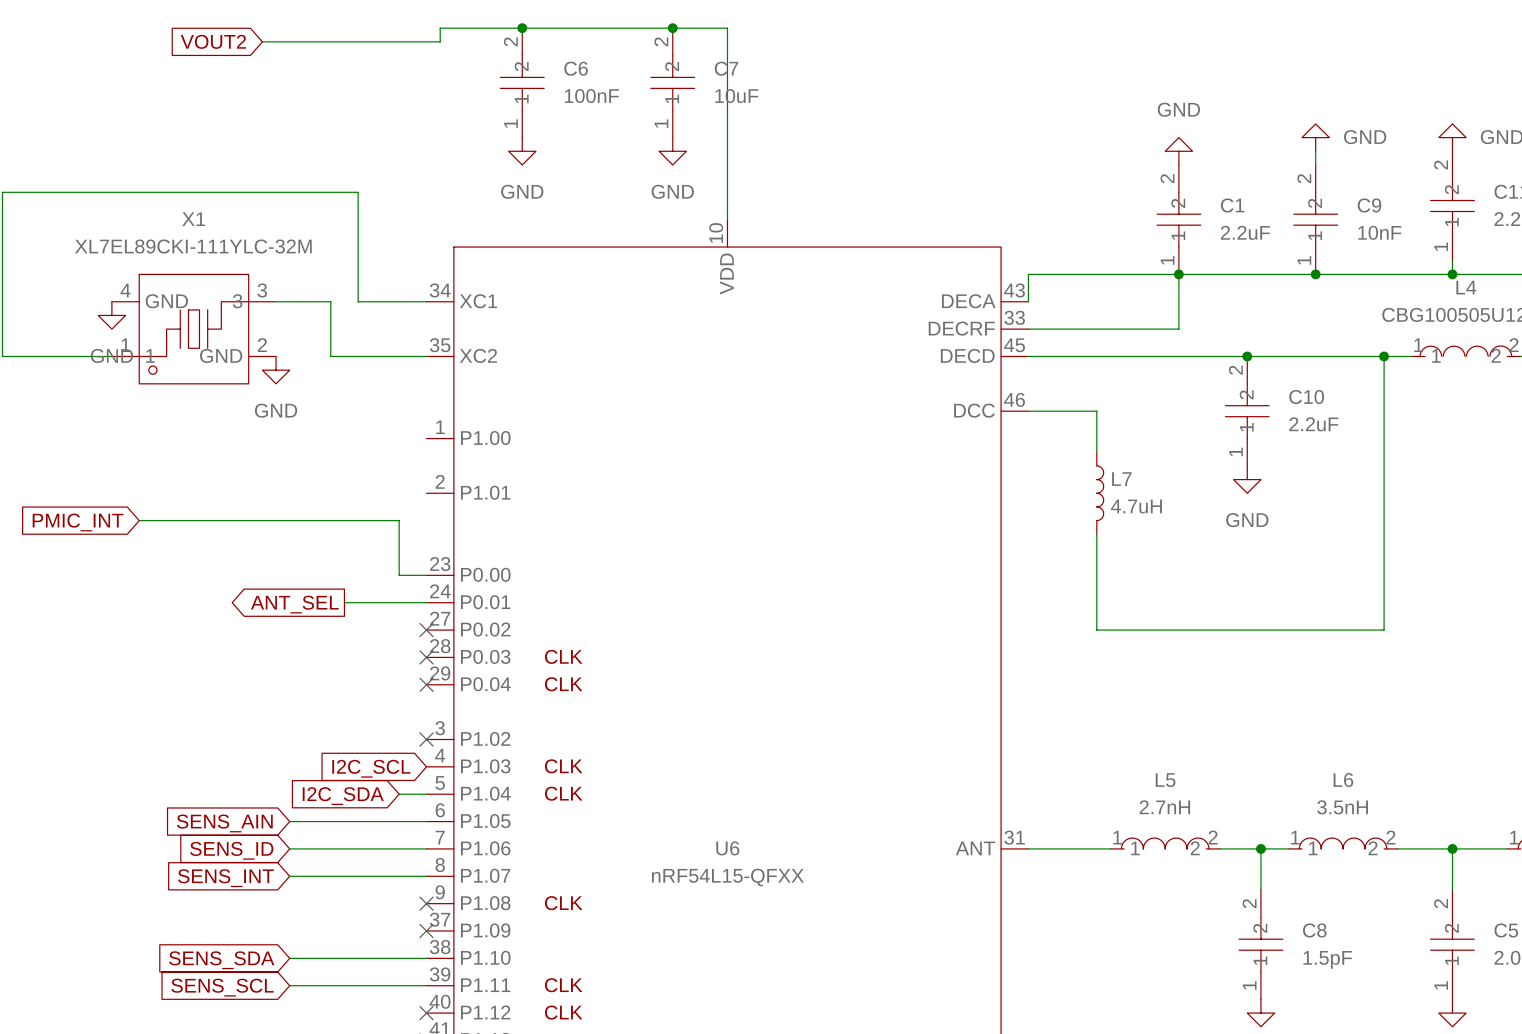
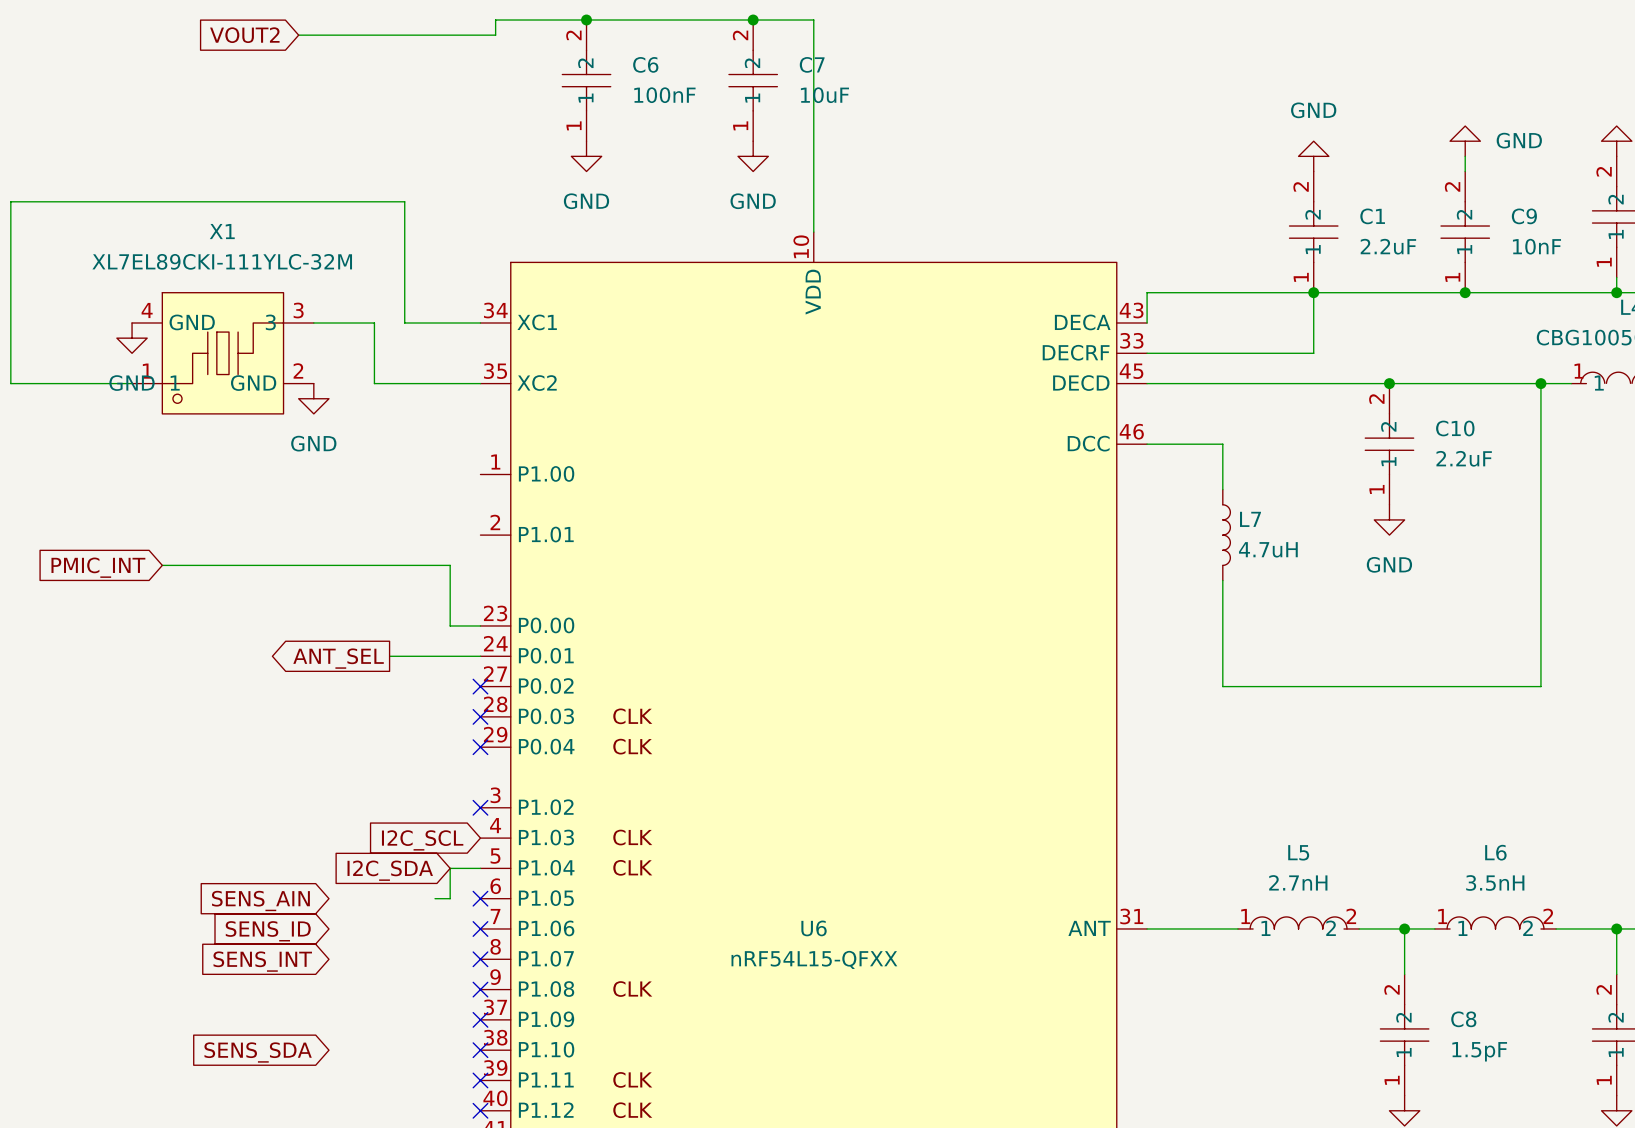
wire: (289, 821) (385, 821) -> none
wire: (399, 821) (426, 821) -> (450, 898) (450, 868)
no-connect mark: none -> (480, 898)
wire: (289, 848) (426, 848) -> none
no-connect mark: none -> (480, 928)
wire: (289, 876) (426, 876) -> none
no-connect mark: none -> (480, 959)
wire: (289, 958) (426, 958) -> none
no-connect mark: none -> (480, 1050)
wire: (289, 985) (426, 985) -> none
no-connect mark: none -> (480, 1080)
global label: SENS_SCL (222, 987) -> none

